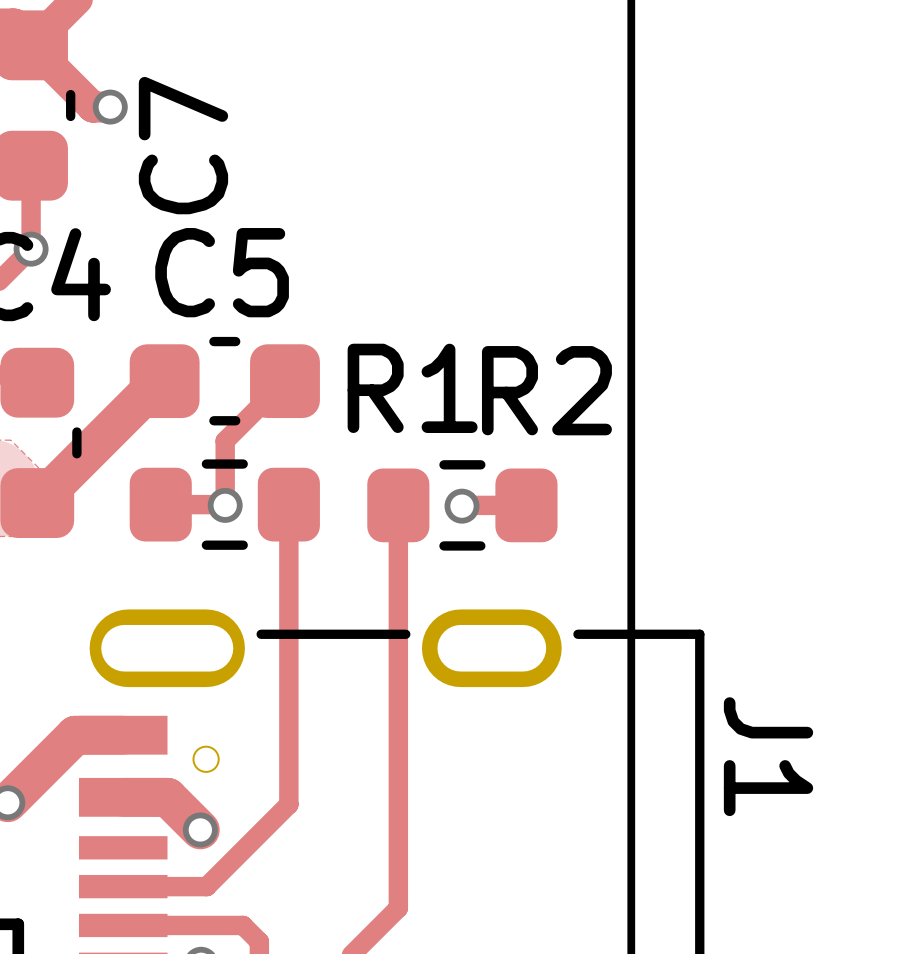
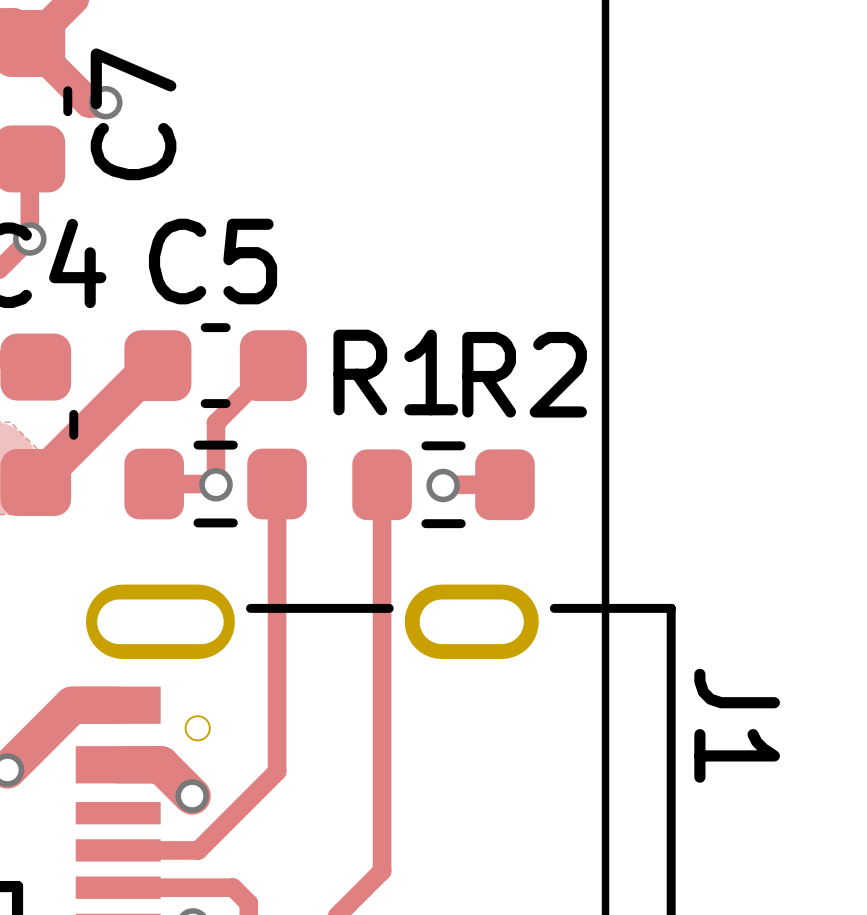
C7 name position: C7 (183, 145) -> C7 (133, 114)

